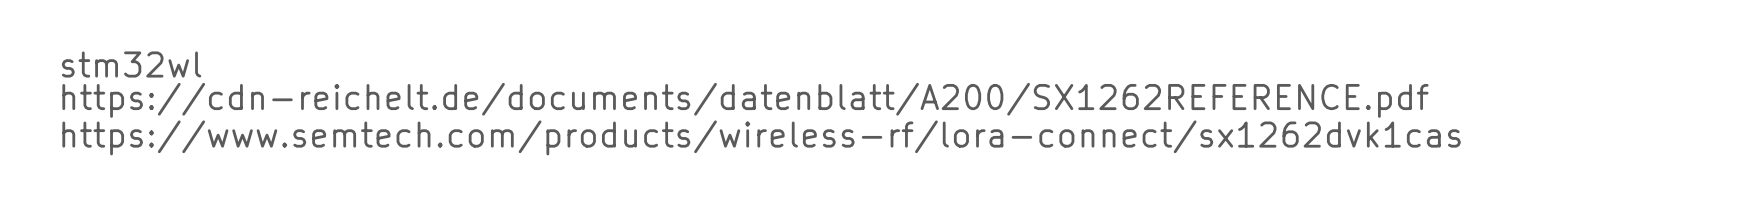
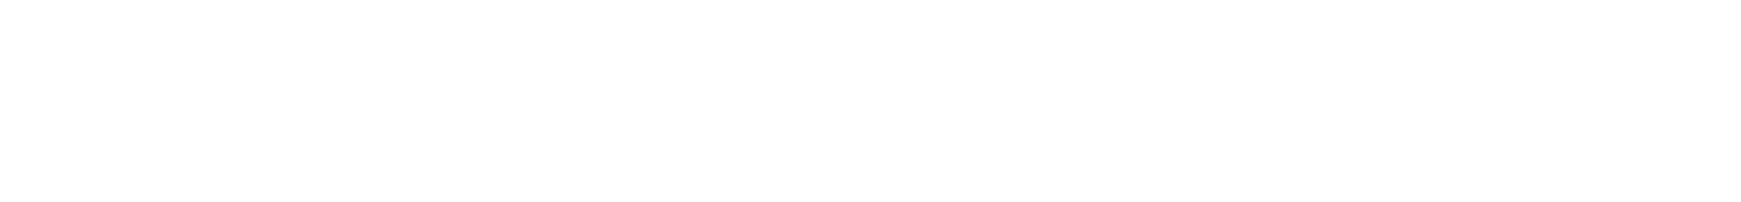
text: stm32wl (131, 64) -> none
text: https://cdn-reichelt.de/documents/datenblatt/A200/SX1262REFERENCE.pdf (745, 100) -> none
text: https://www.semtech.com/products/wireless-rf/lora-connect/sx1262dvk1cas (761, 137) -> none

